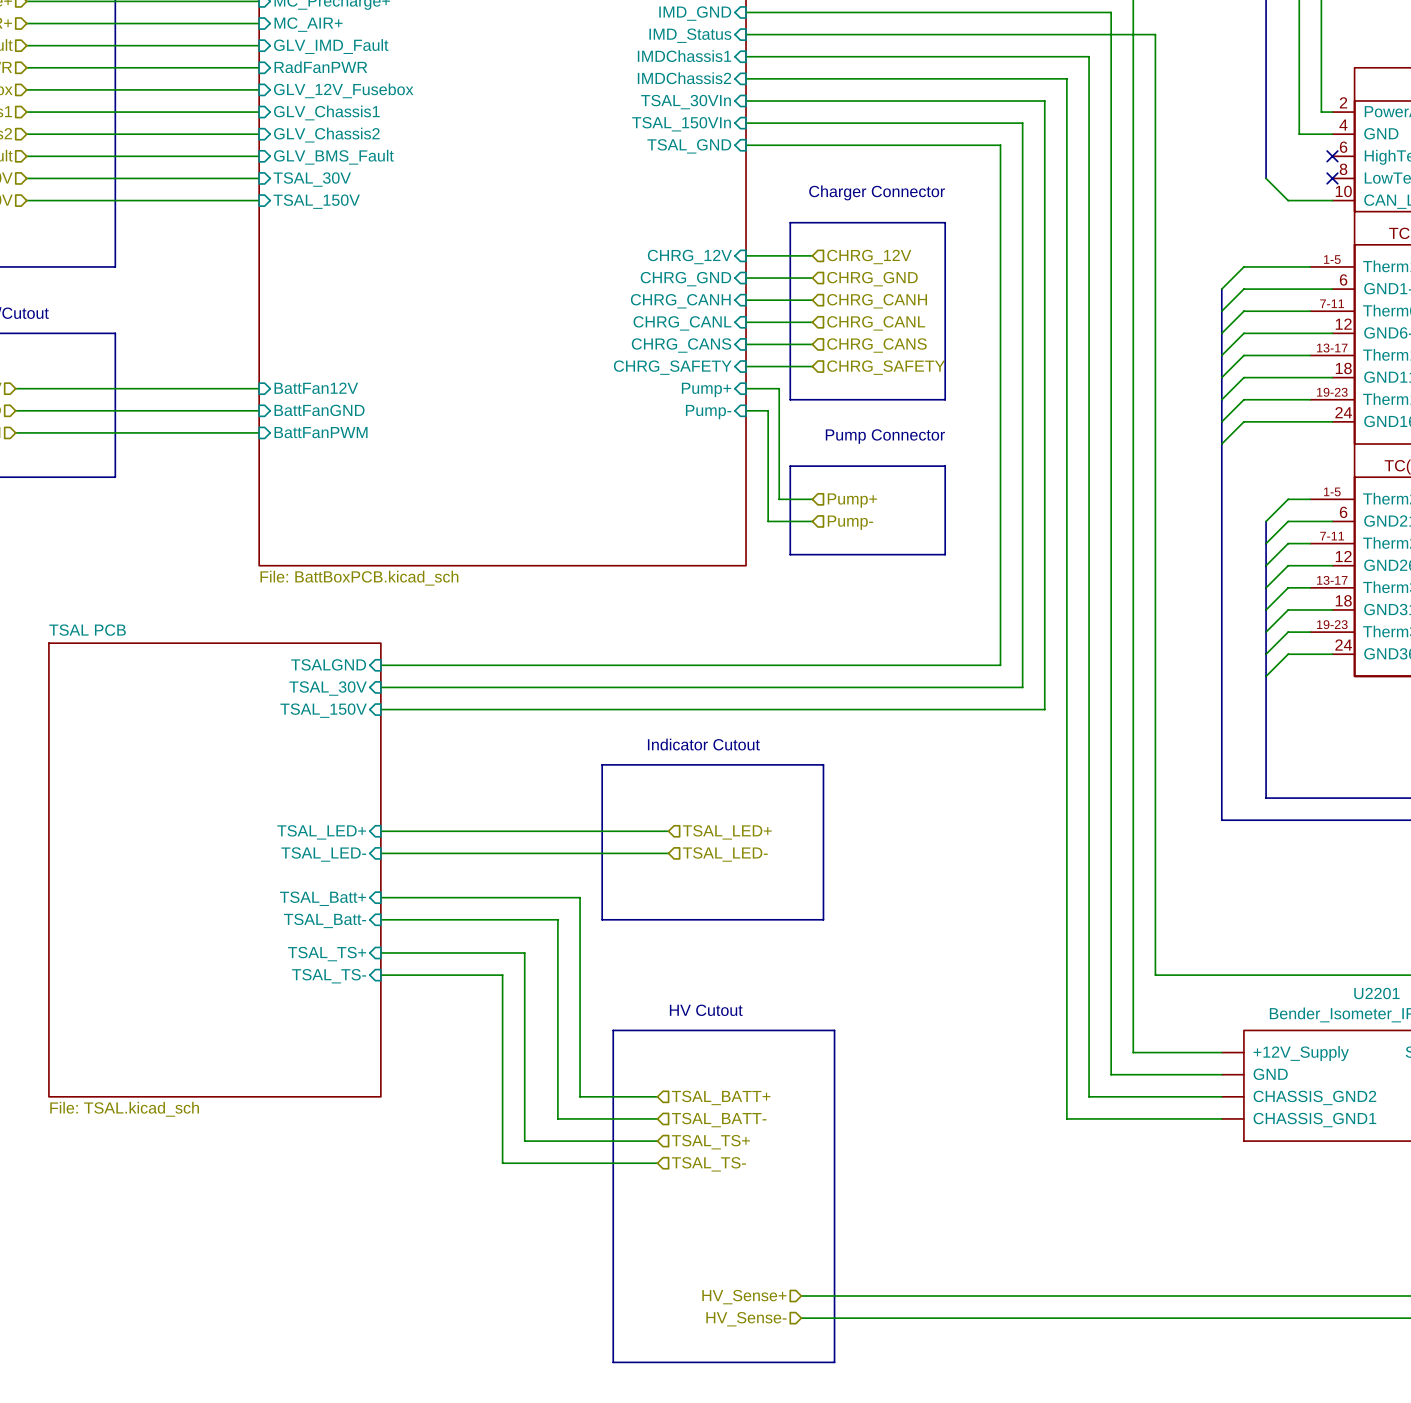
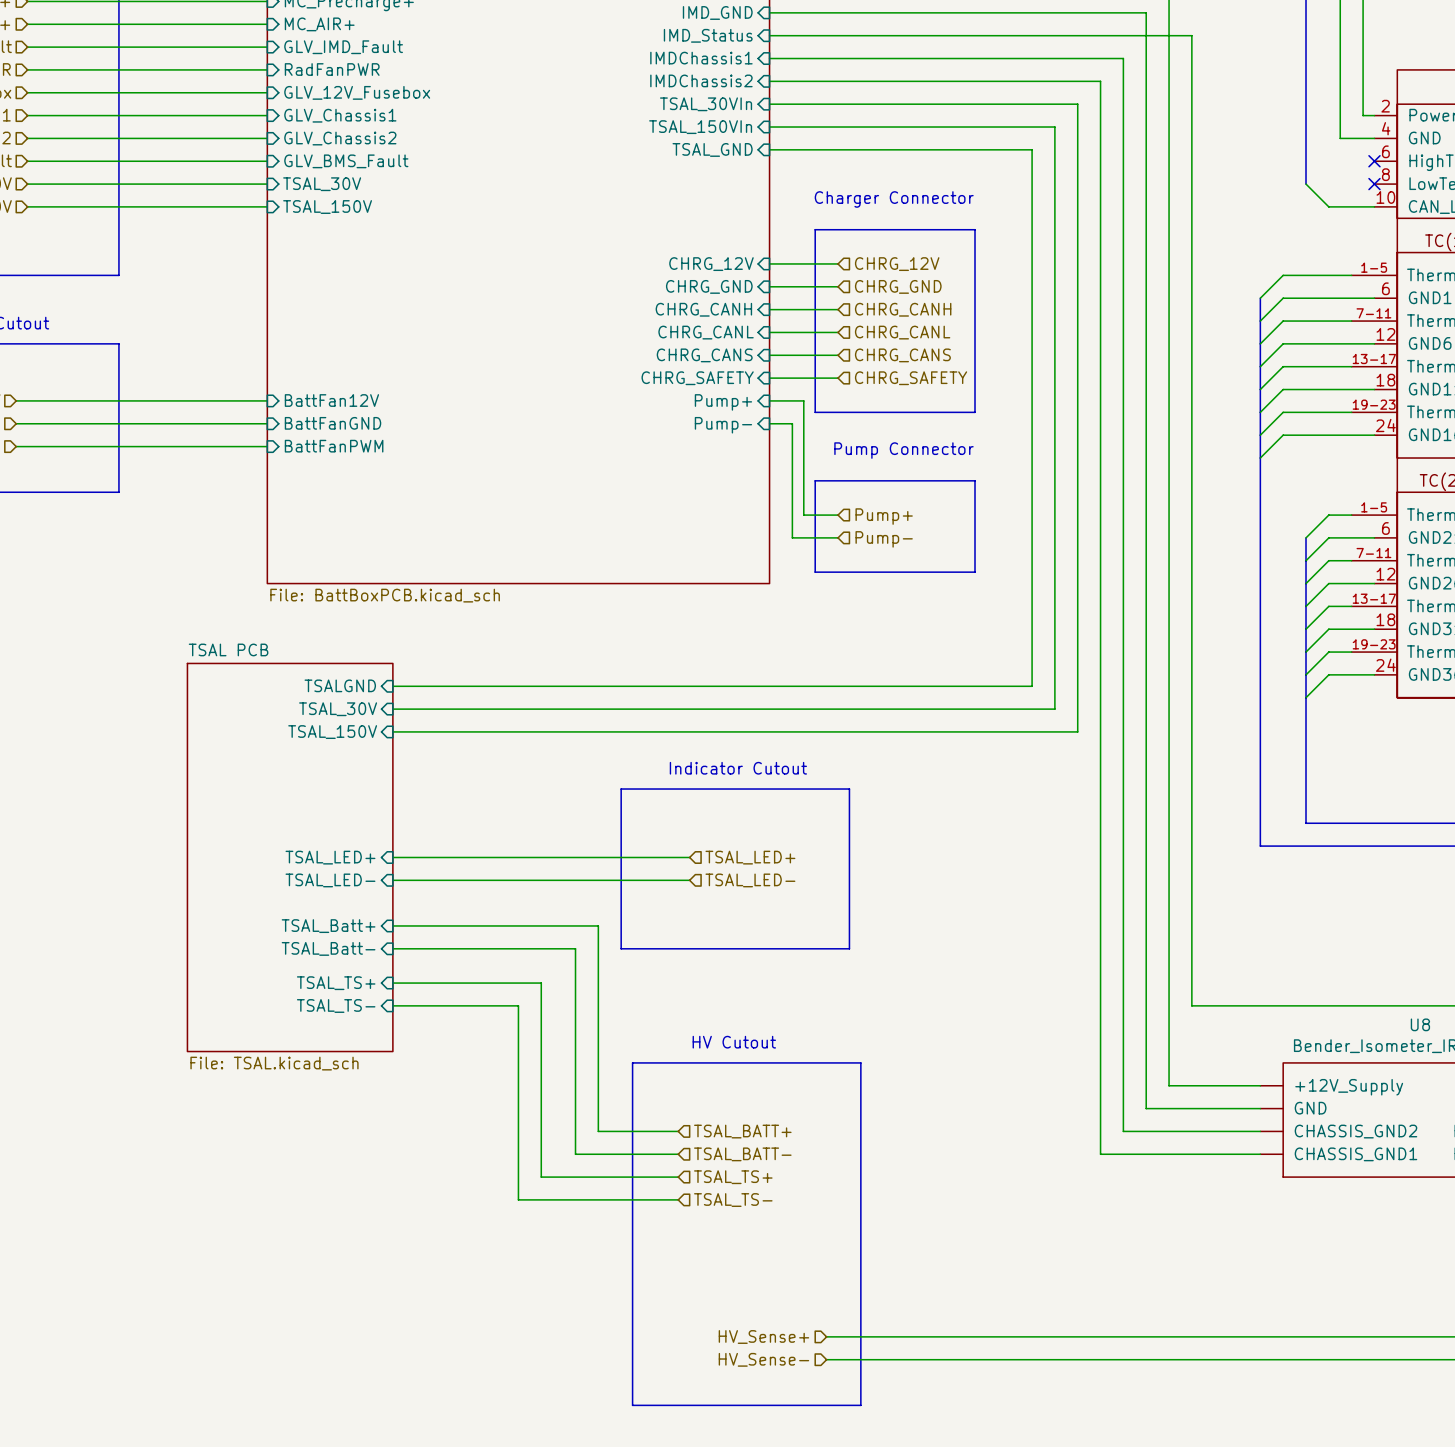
sheet TSAL PCB: none -> File: TSAL.kicad_sch (290, 857)
sheet TSAL PCB: File: TSAL.kicad_sch (214, 870) -> none
U2201 name: U2201 (1376, 993) -> U8 (1420, 1024)

